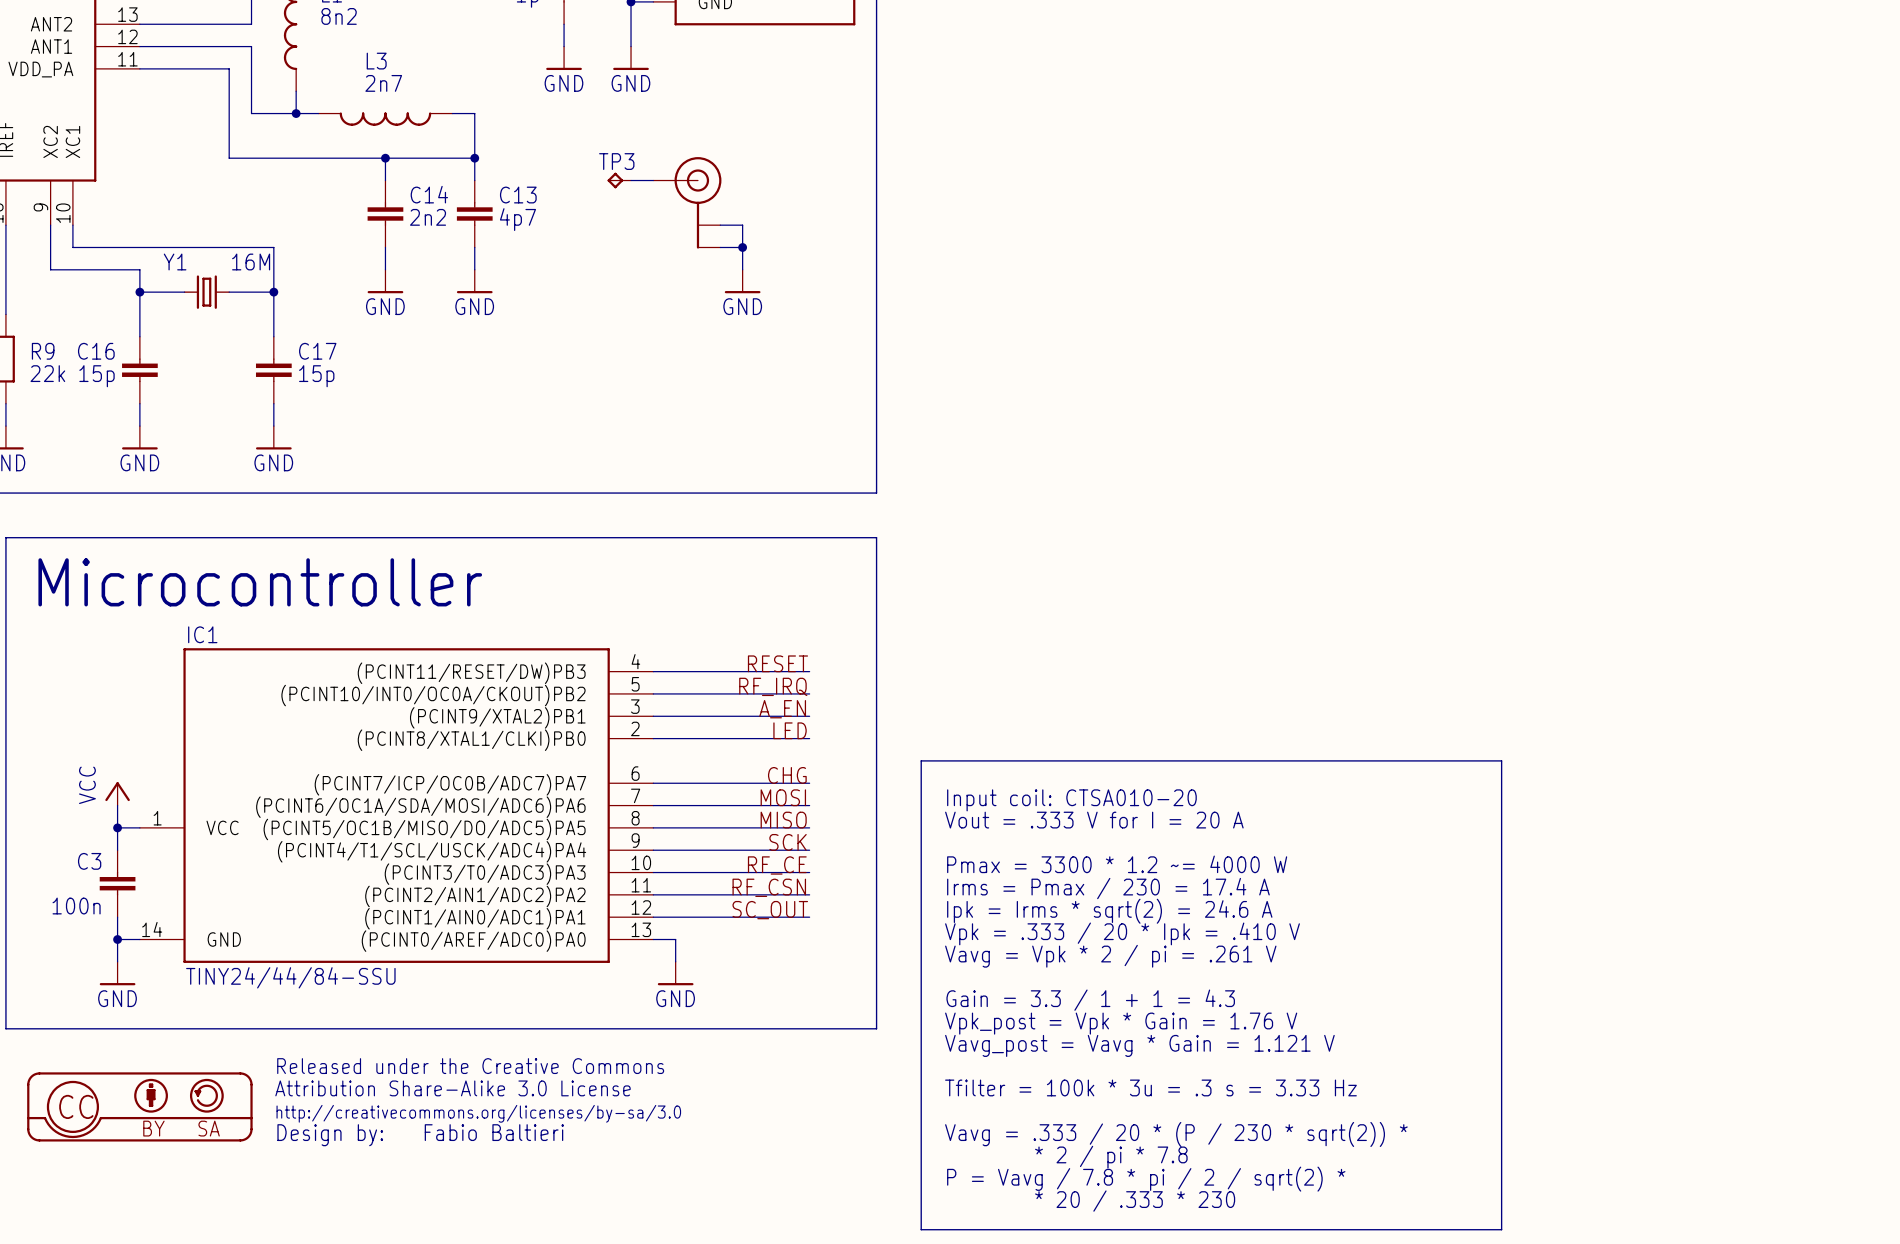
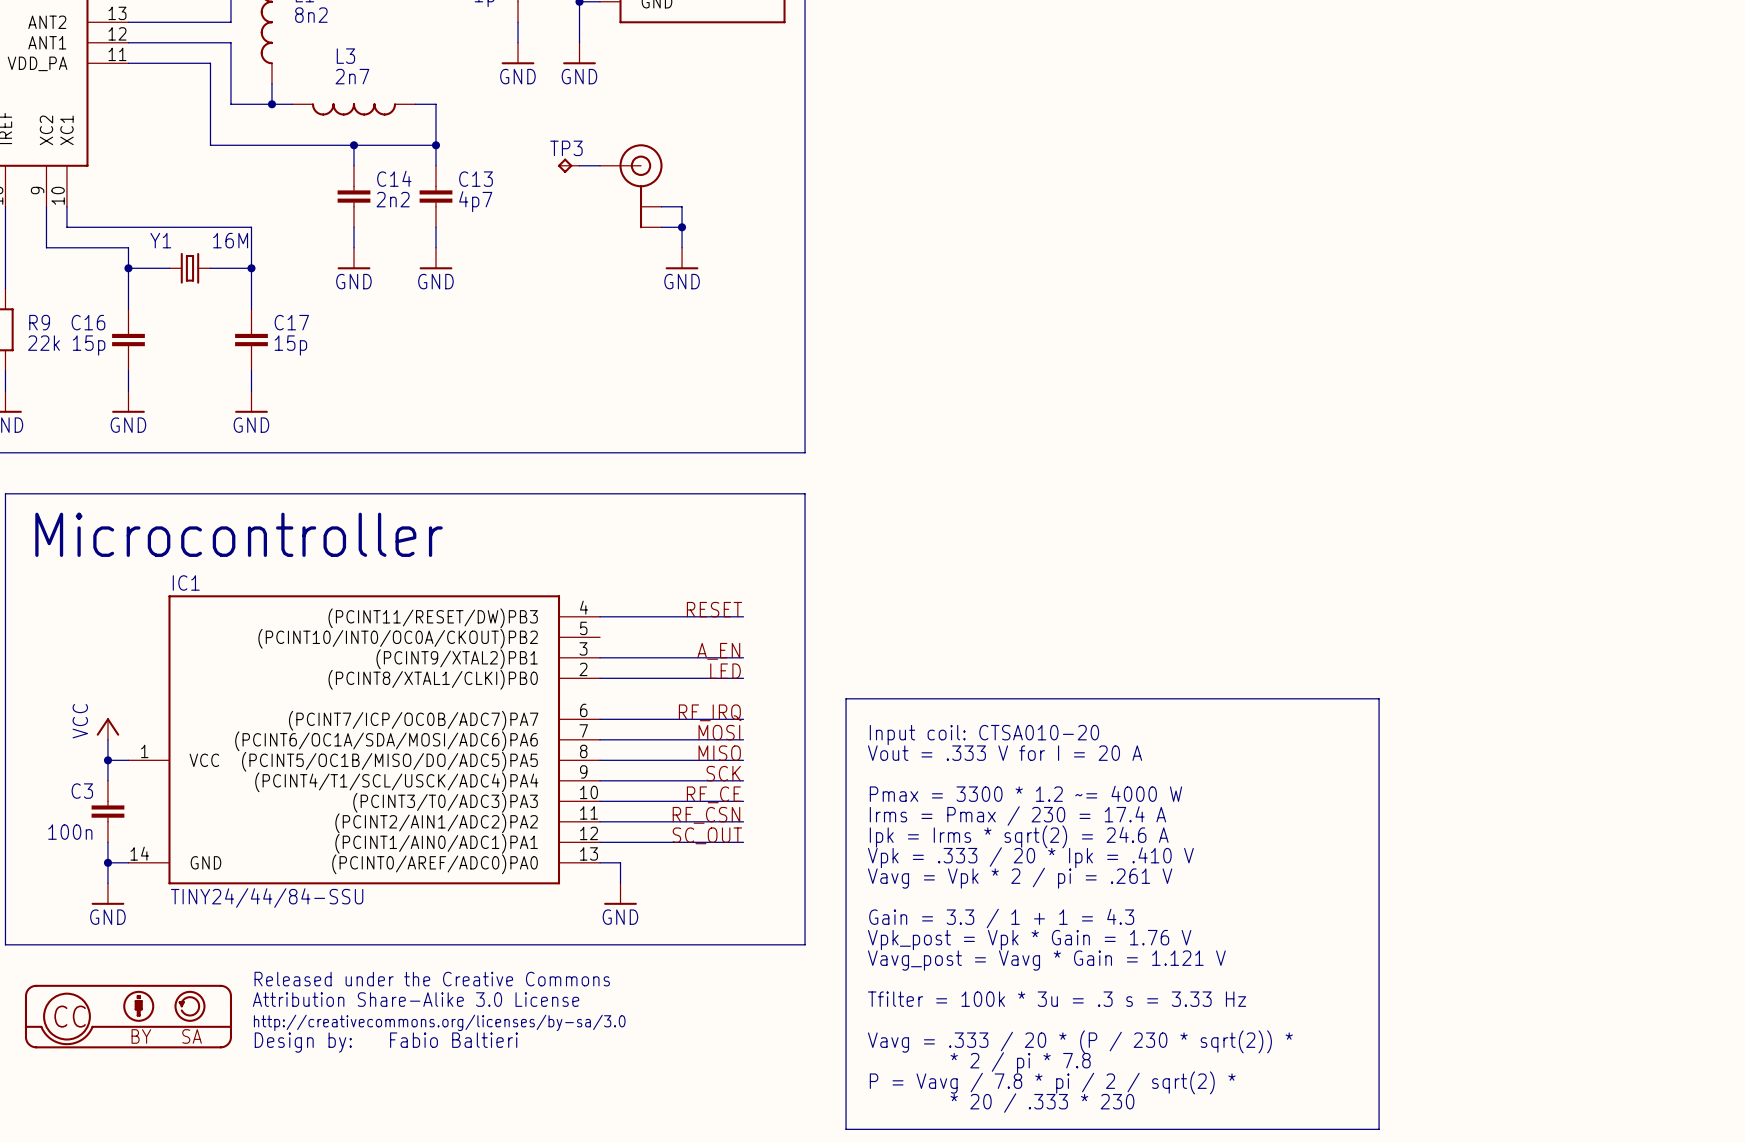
label: RF_IRQ (773, 686) -> none
wire: (653, 693) (809, 693) -> none
label: CHG (787, 775) -> RF_IRQ (710, 712)

